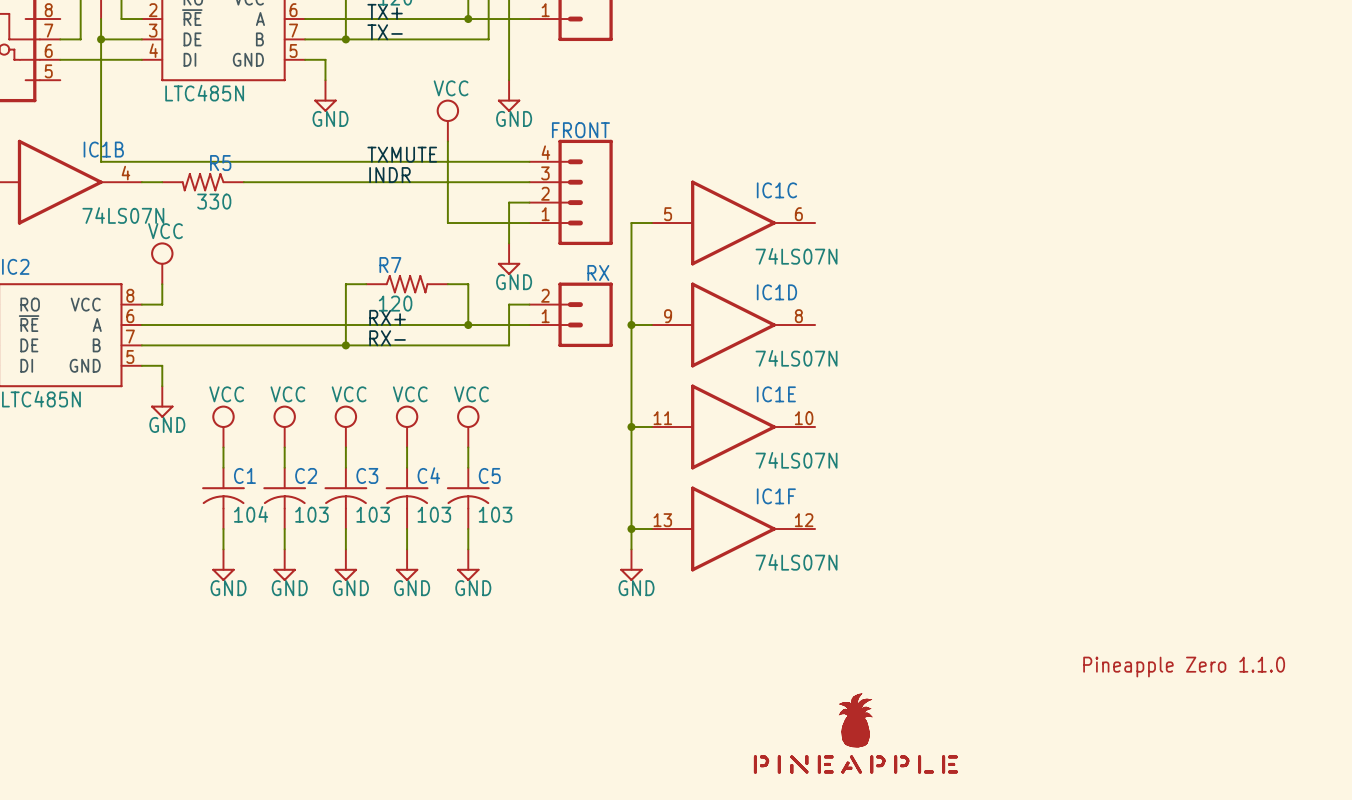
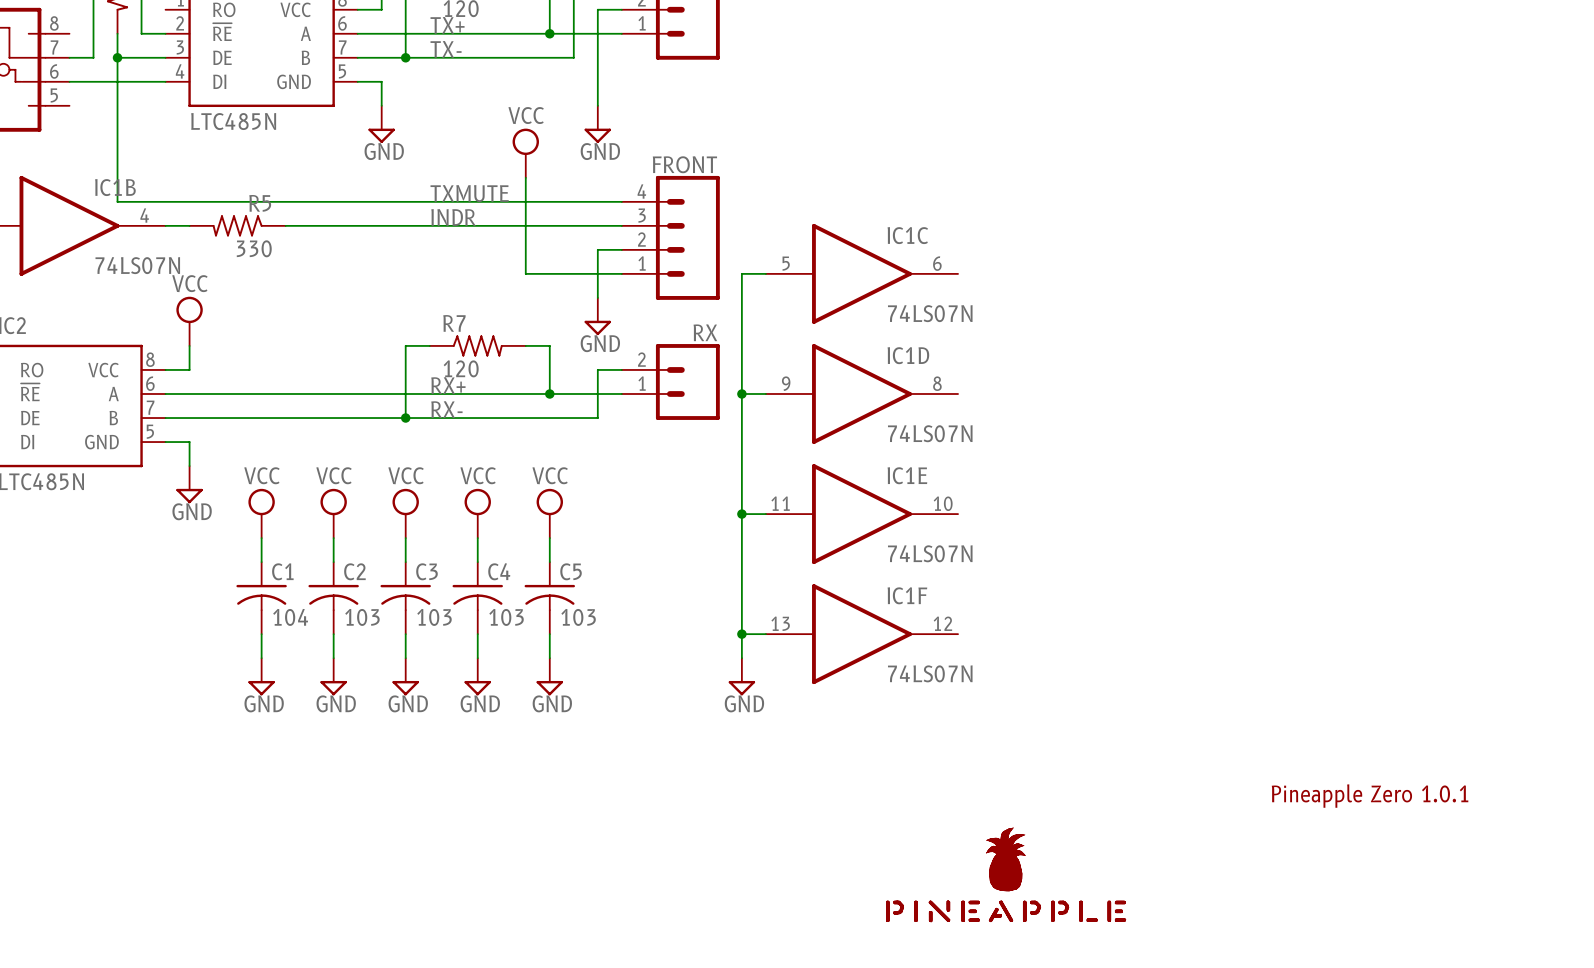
text: Pineapple Zero 1.1.0 (1184, 667) -> Pineapple Zero 1.0.1 (1370, 796)

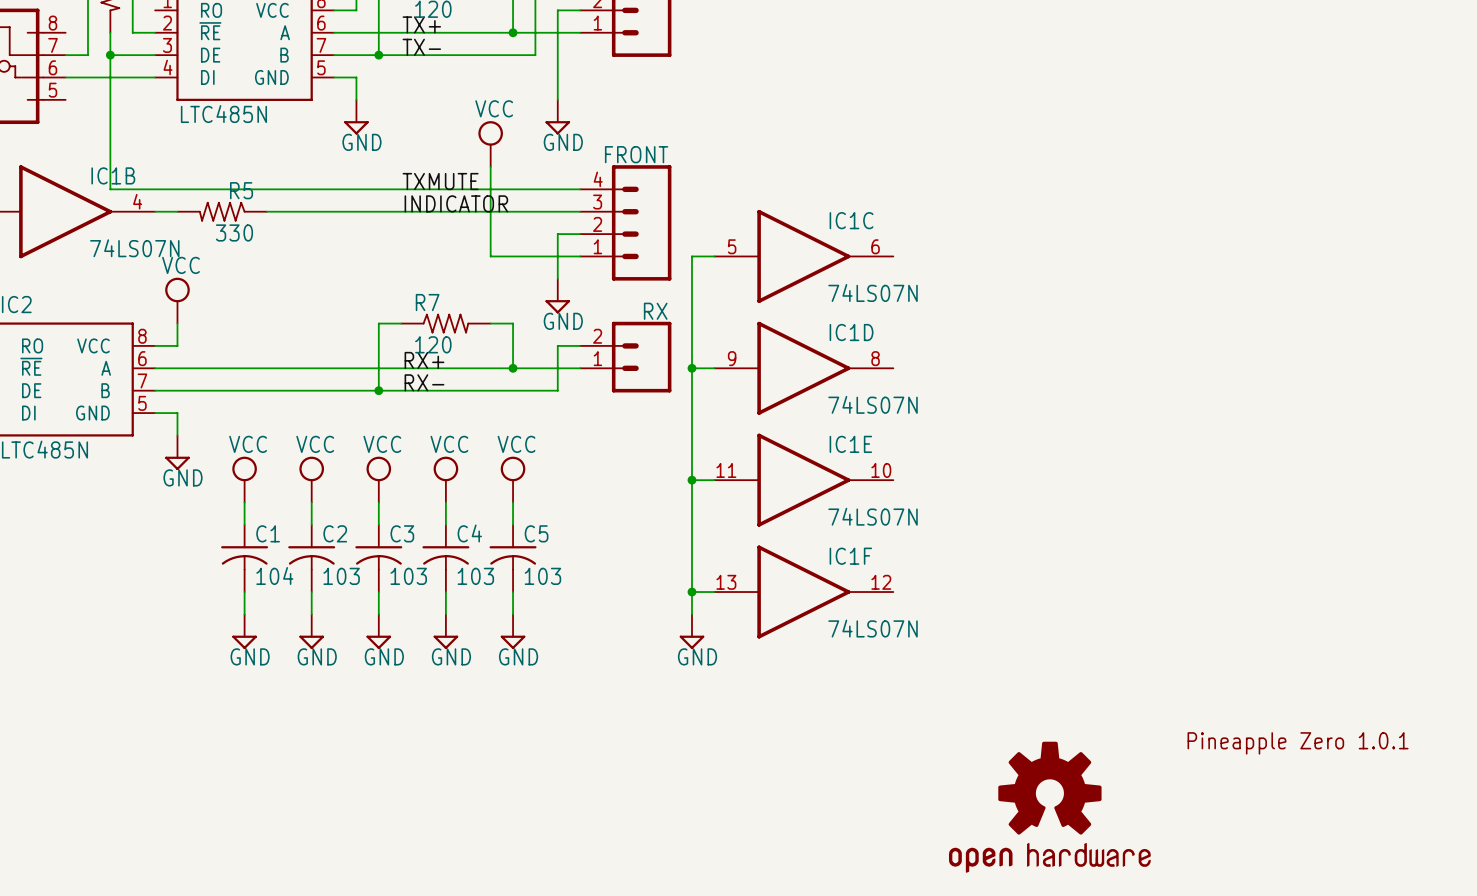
label: INDR (453, 217) -> INDICATOR (456, 203)
part: none -> (1049, 807)
part: (1006, 874) -> none

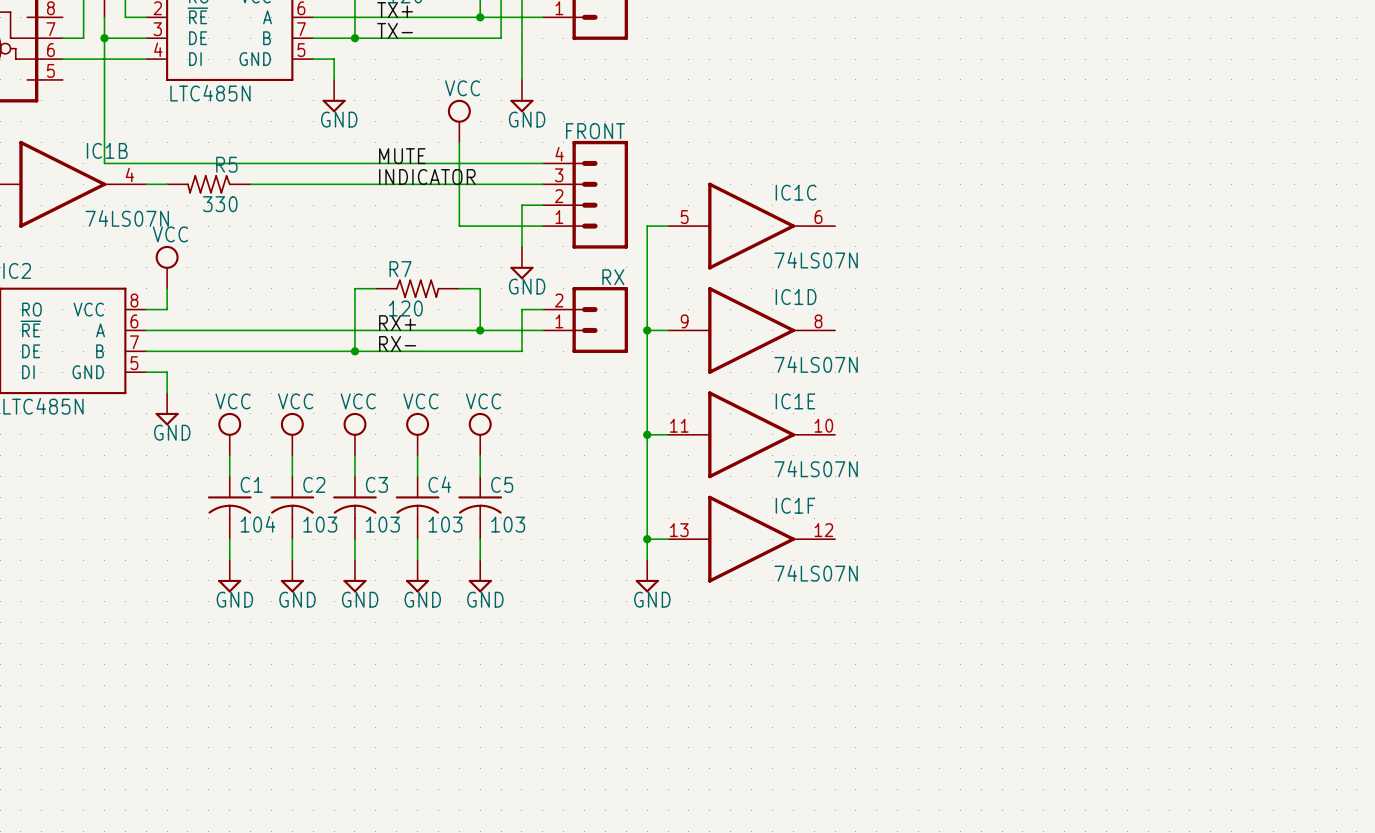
label: TXMUTE (440, 181) -> MUTE (402, 156)
text: Pineapple Zero 1.0.1 (1298, 743) -> none
part: (1049, 807) -> none

